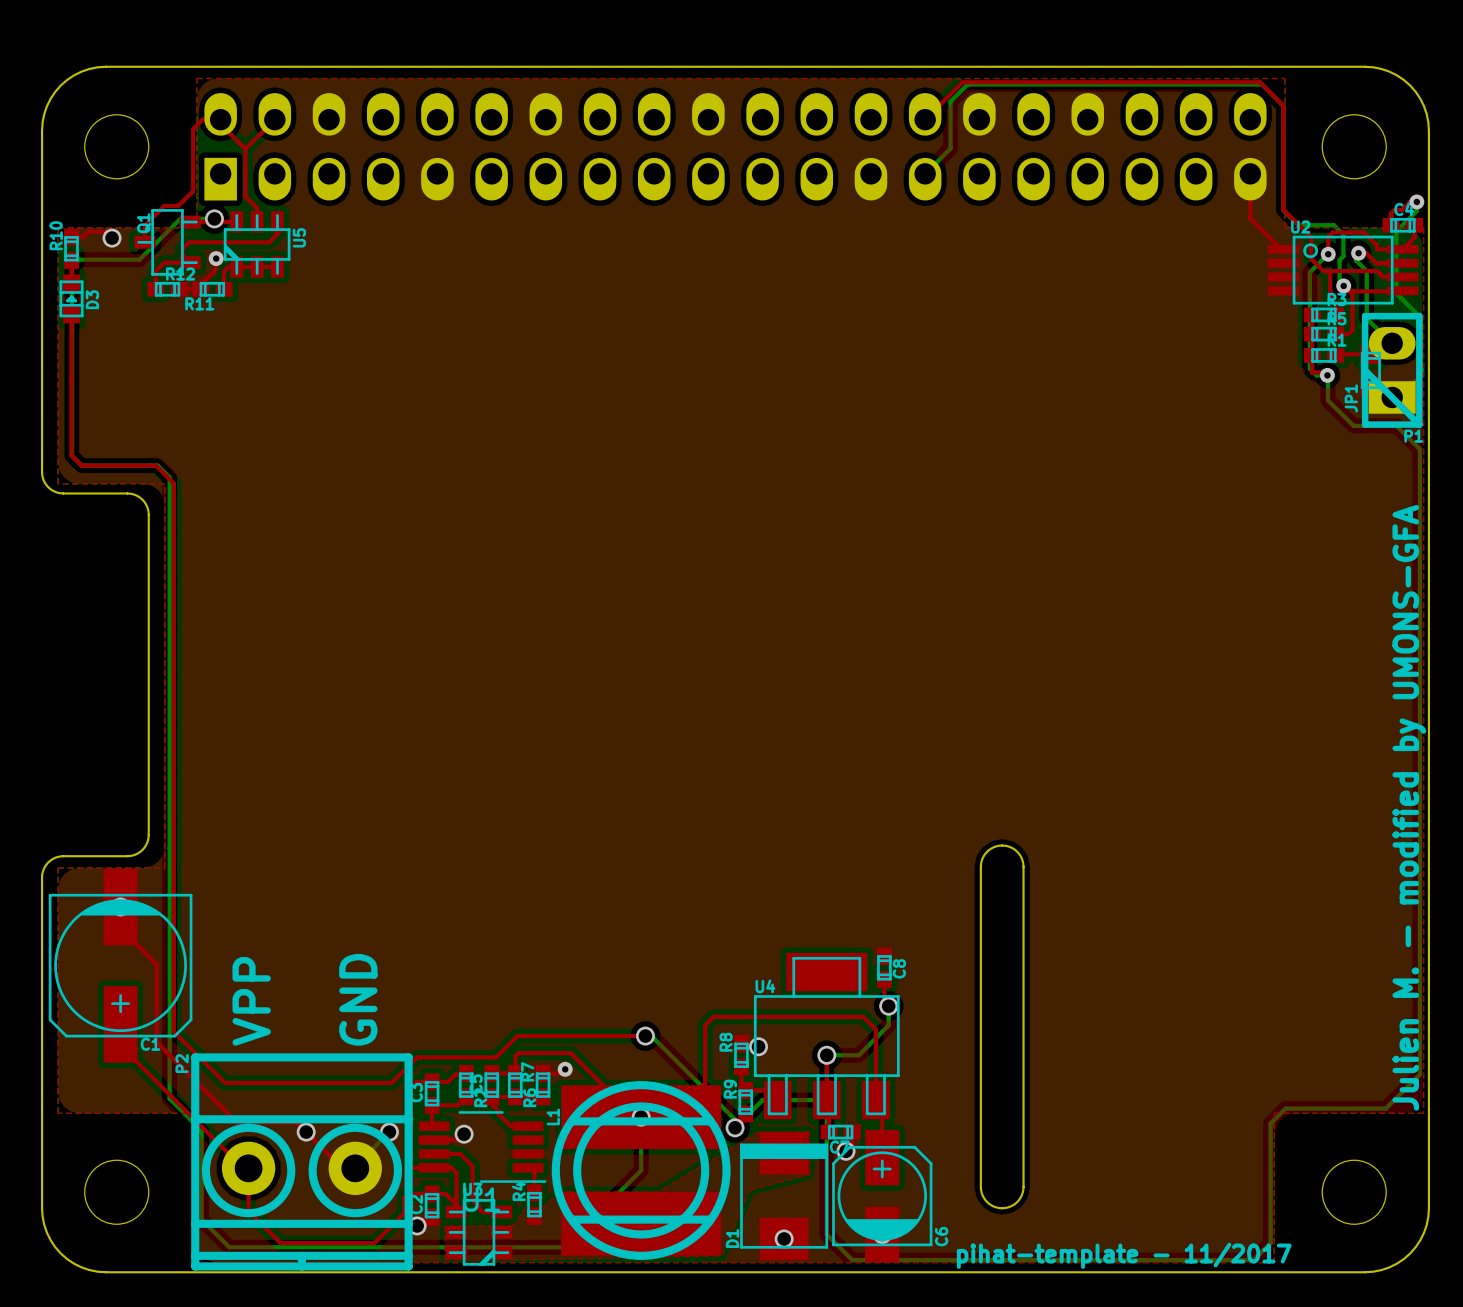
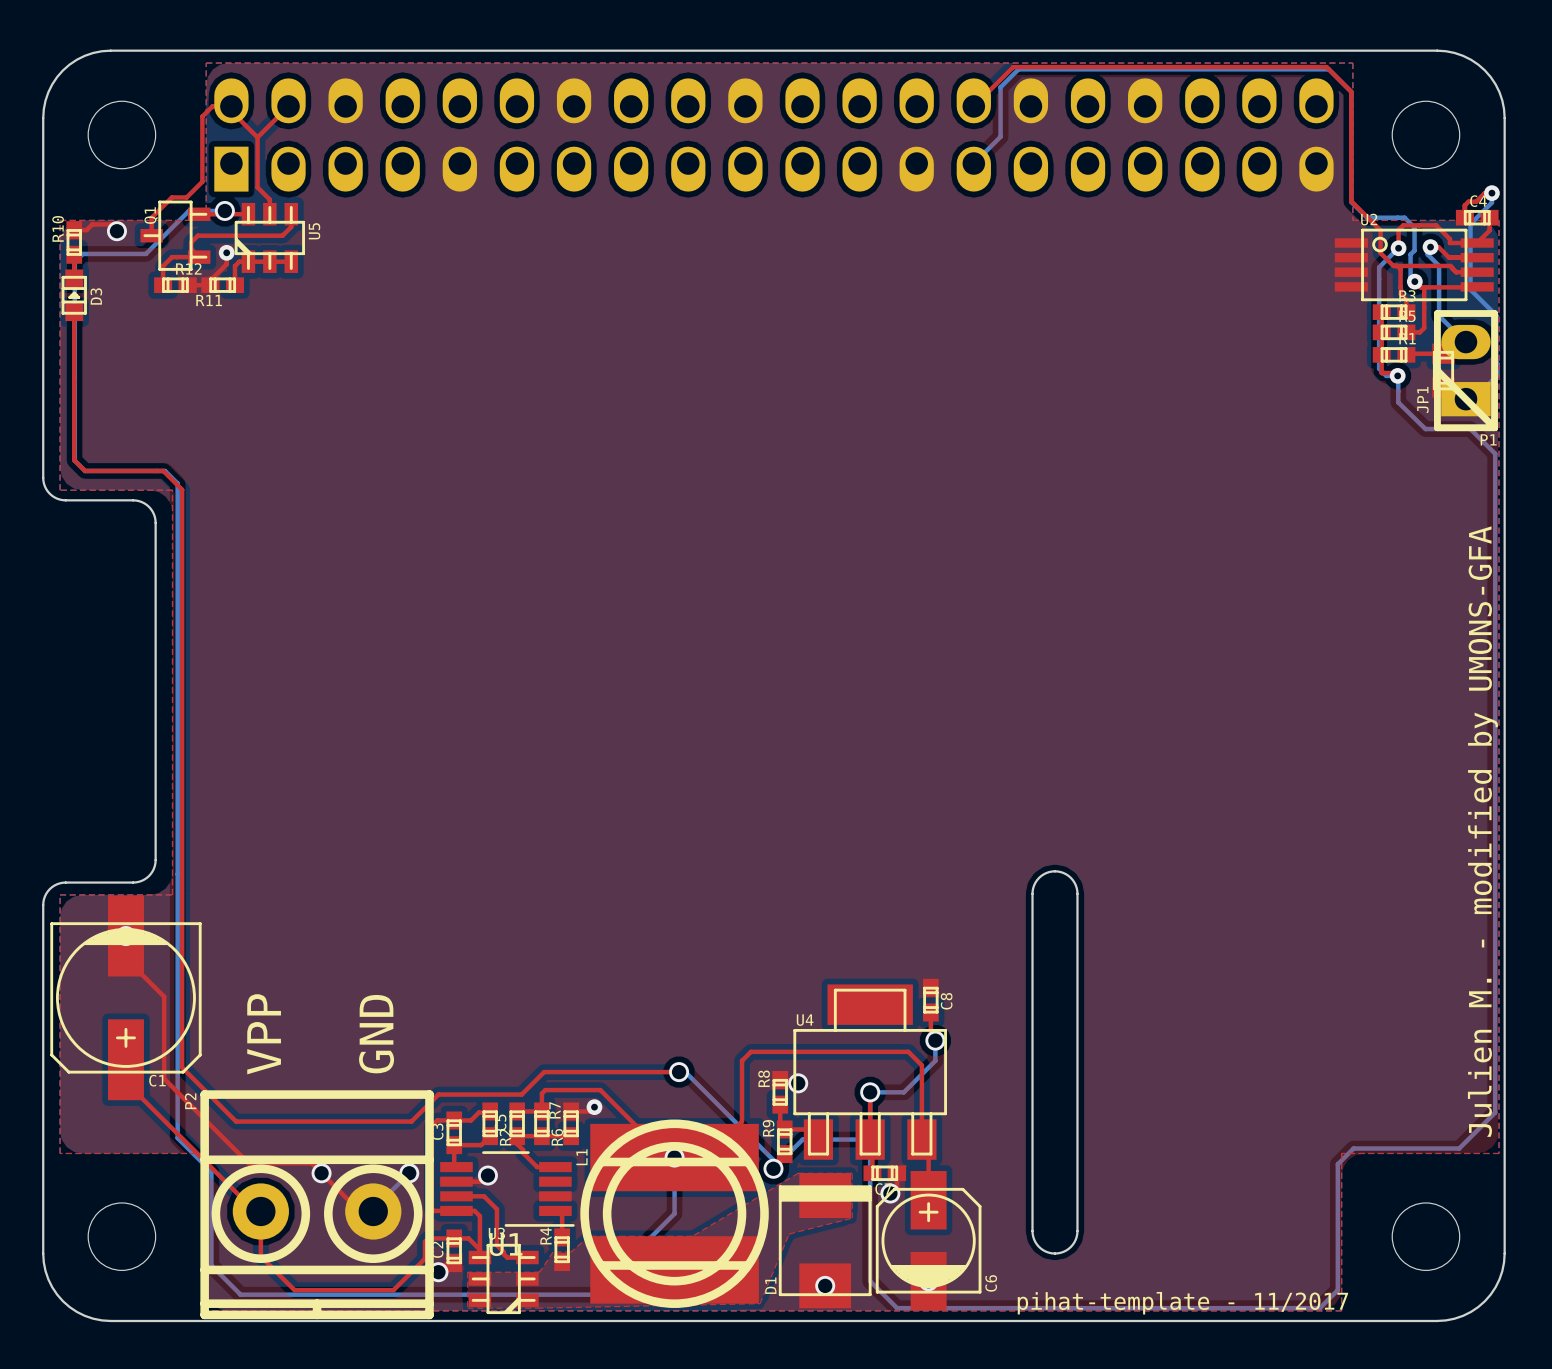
top track: (1250, 173) (1250, 218) (1281, 249) (1283, 249) -> none

